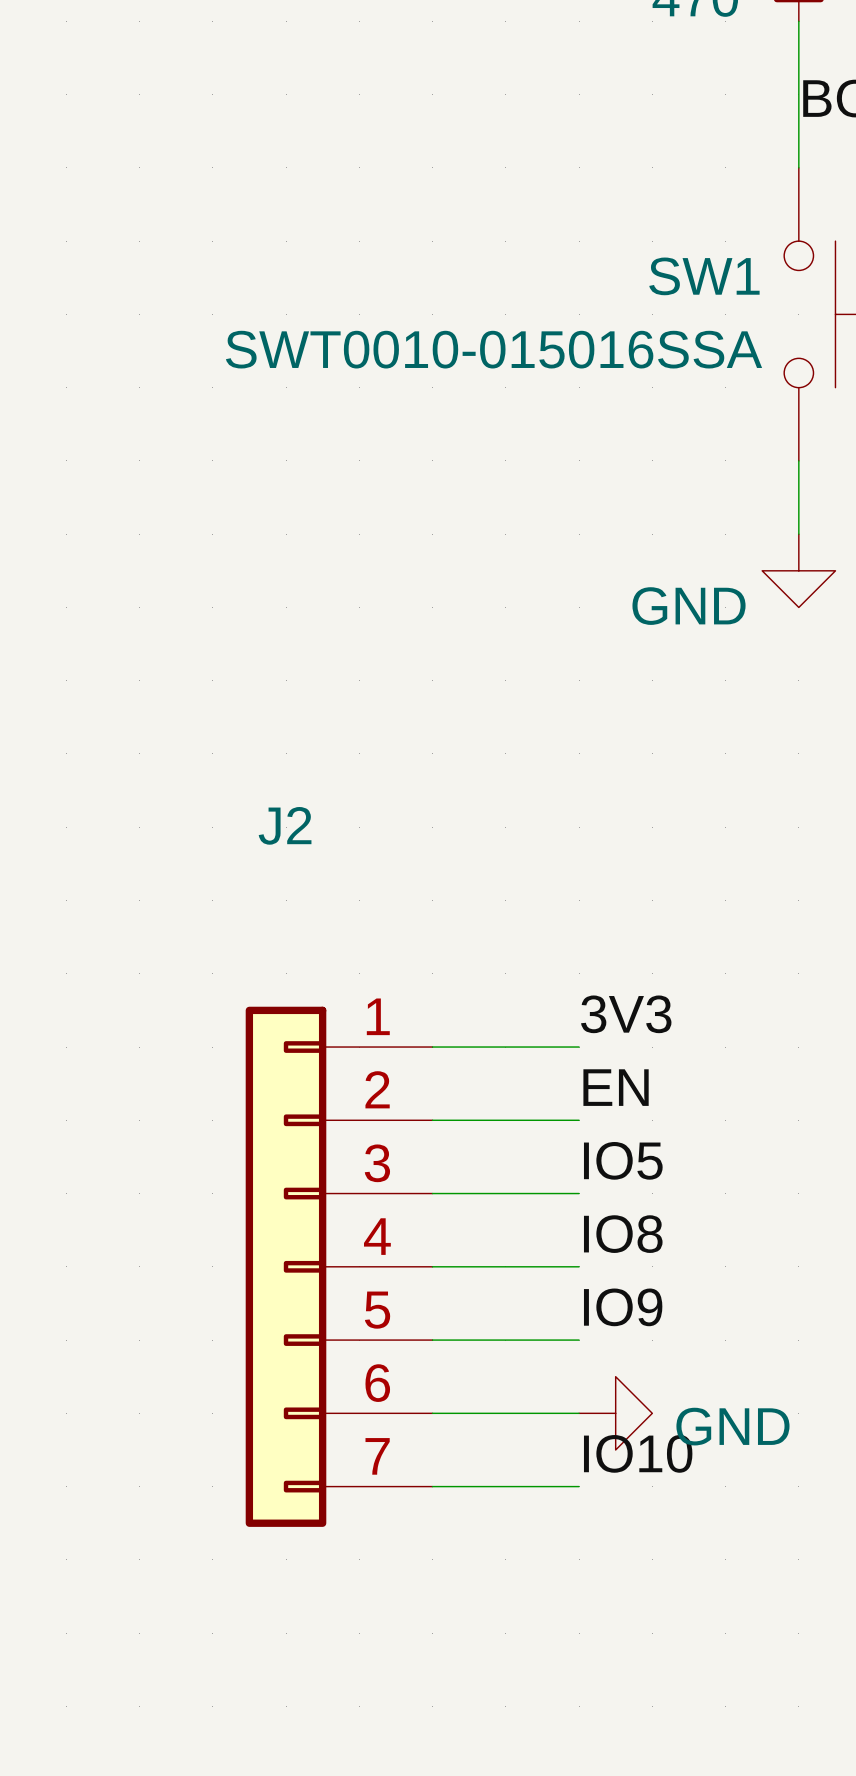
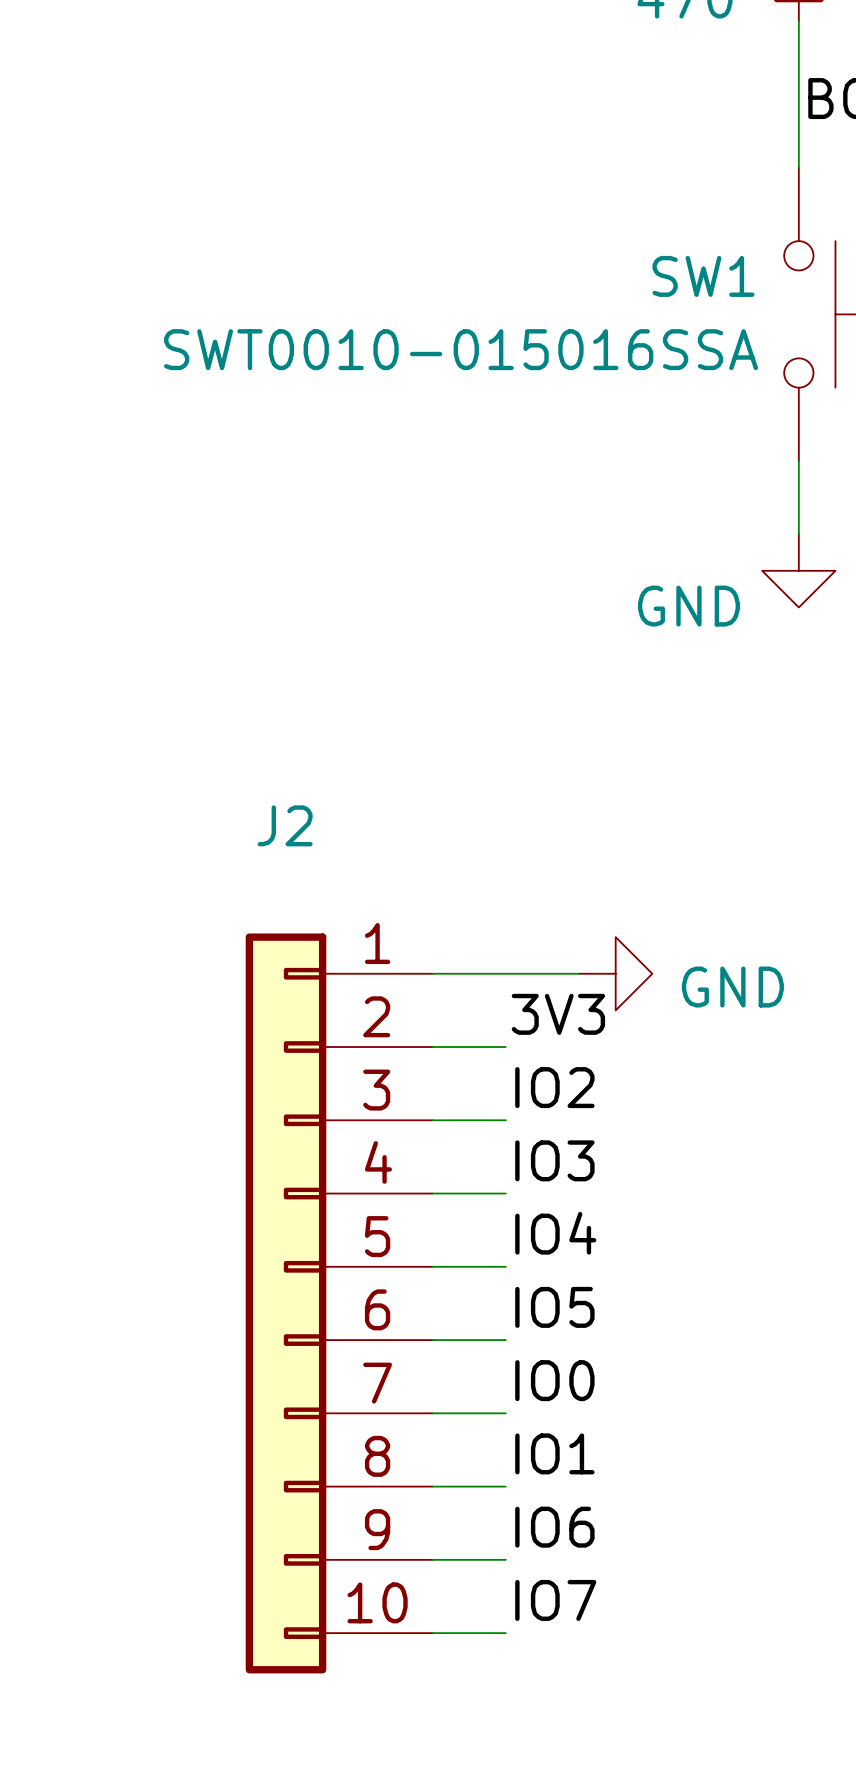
wire: none -> (432, 973) (579, 973)
J2 symbol: [245, 1006, 433, 1527] -> [245, 933, 433, 1674]
label position: 3V3 (626, 1014) -> 3V3 (558, 1014)
wire: (505, 1047) (579, 1047) -> none
label: none -> IO2 (554, 1087)
label: EN (616, 1087) -> none
wire: (505, 1120) (579, 1120) -> none
label: none -> IO3 (554, 1160)
label position: IO5 (623, 1160) -> IO5 (554, 1307)
wire: (505, 1193) (579, 1193) -> none
label: none -> IO4 (555, 1233)
label: IO8 (623, 1234) -> none
wire: (505, 1266) (579, 1266) -> none
label: IO9 (623, 1307) -> none
wire: (505, 1340) (579, 1340) -> none
label: none -> IO0 (554, 1380)
wire: (505, 1413) (579, 1413) -> (432, 1559) (505, 1559)
power symbol position: GND (615, 1413) -> GND (615, 973)
label: none -> IO1 (554, 1453)
label: IO10 (638, 1453) -> none
wire: (505, 1486) (579, 1486) -> (432, 1633) (505, 1633)
label: none -> IO6 (554, 1527)
label: none -> IO7 (555, 1600)

